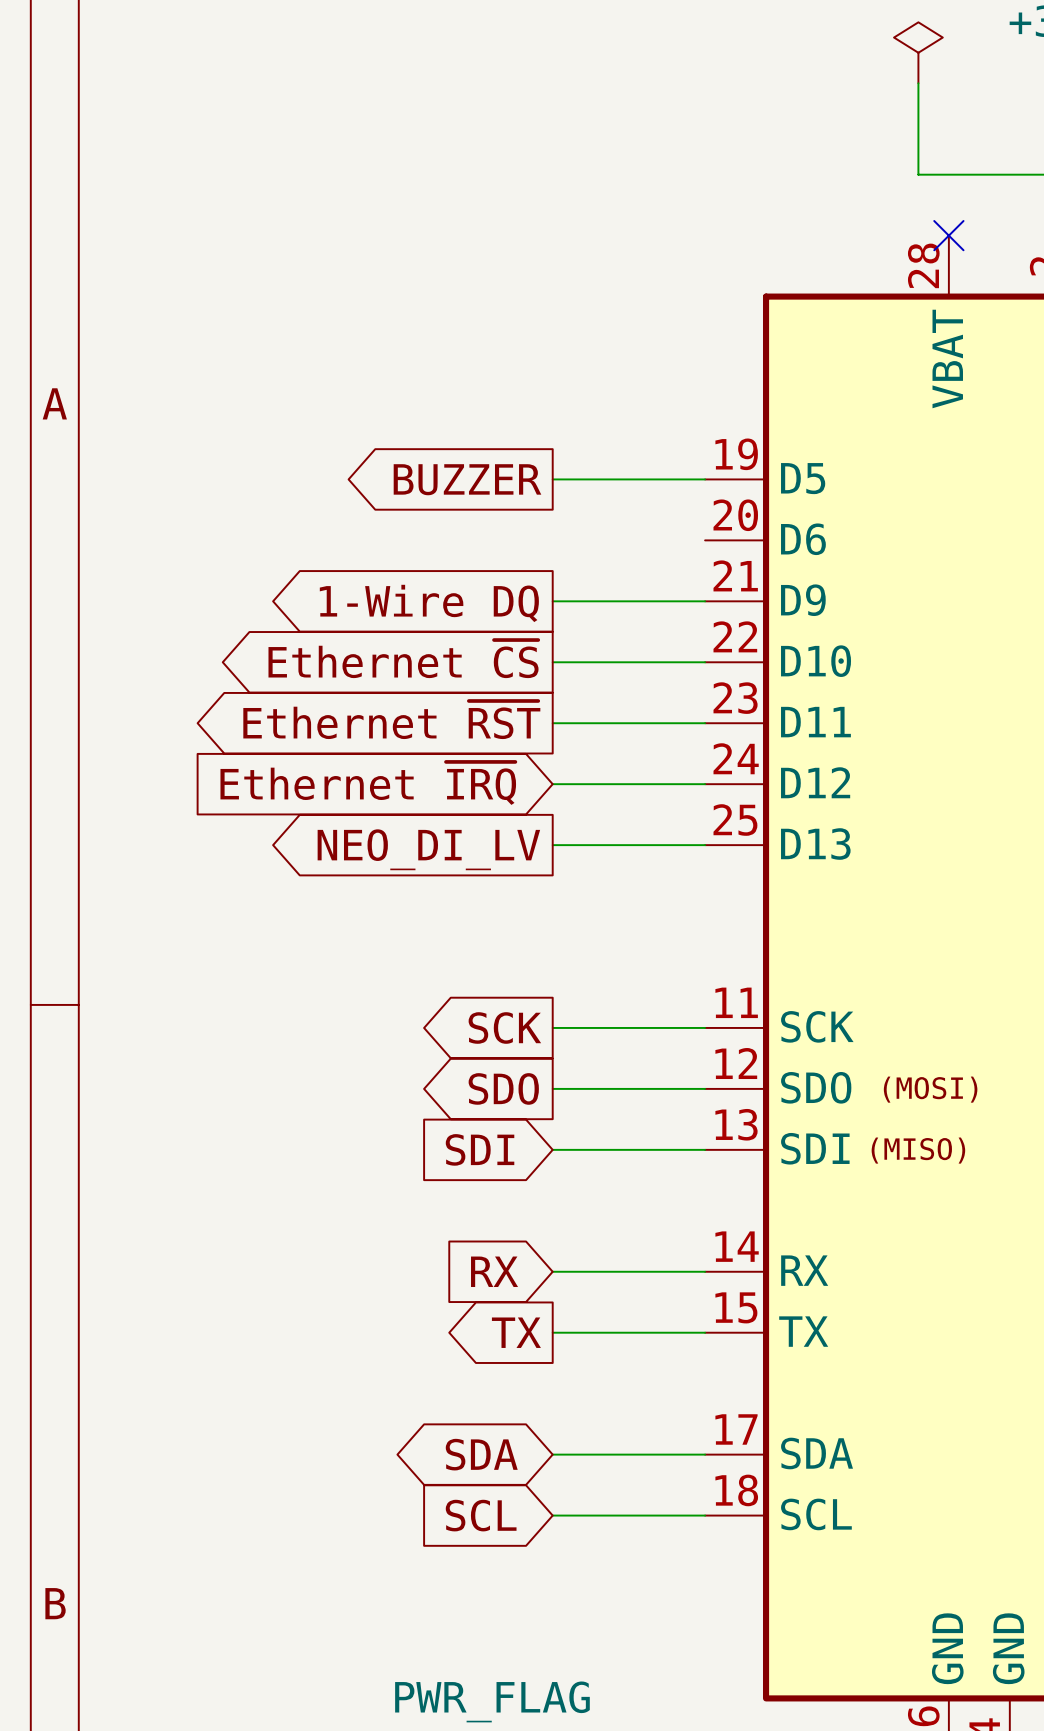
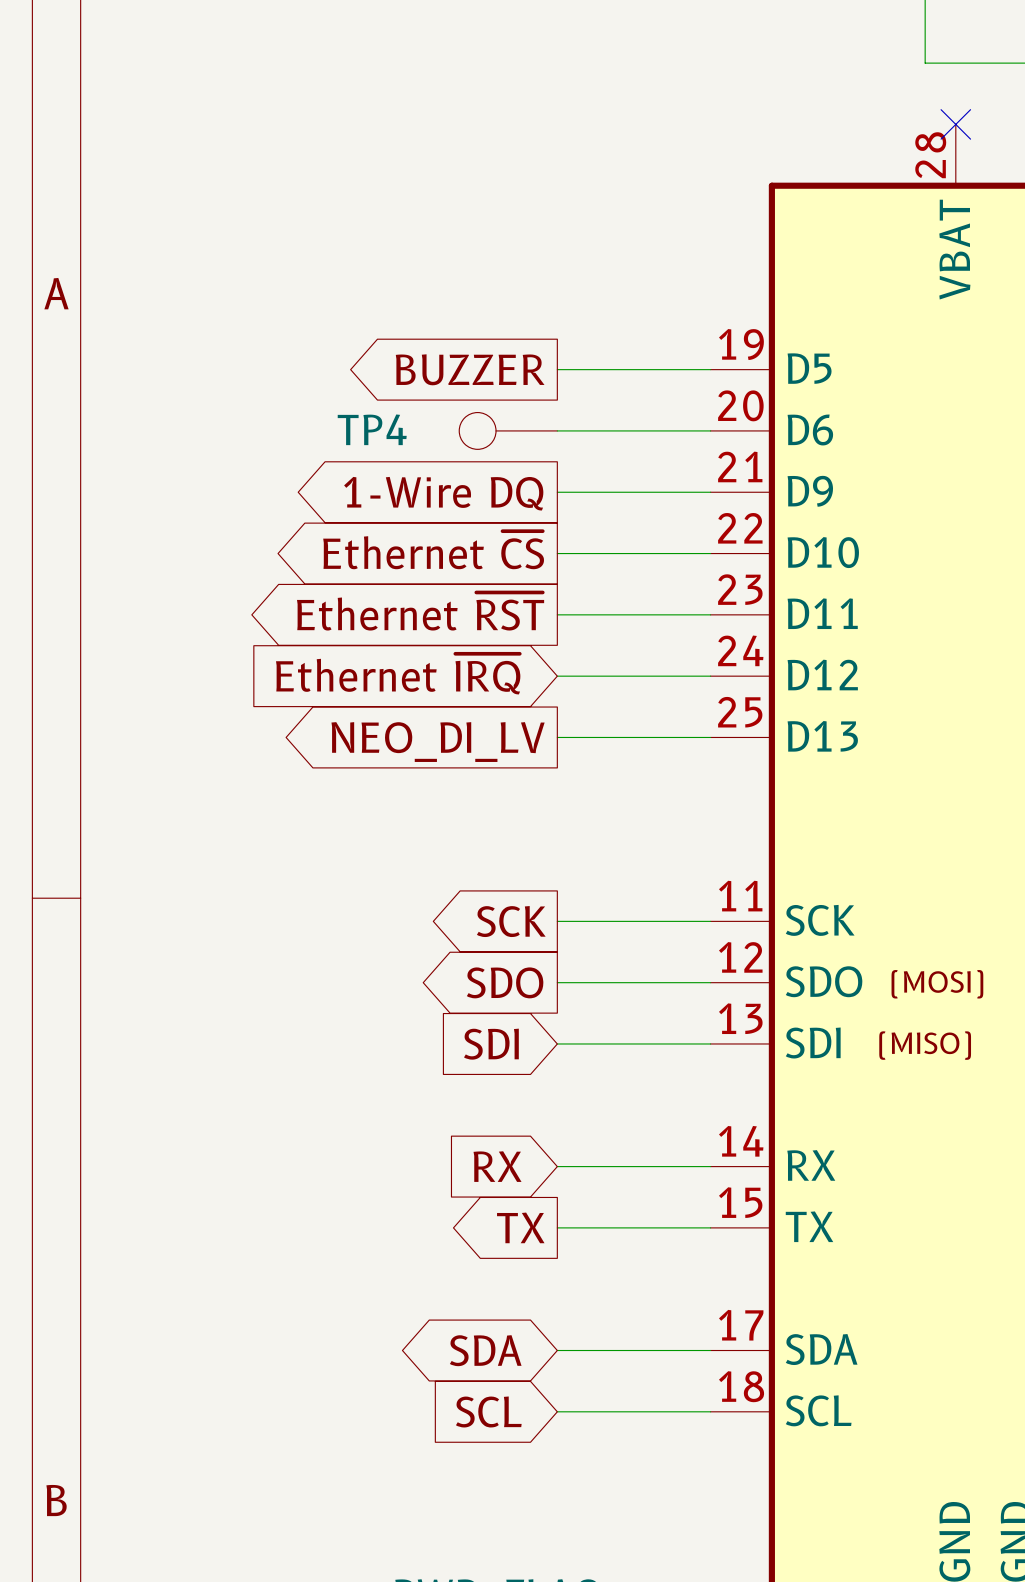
TP4: none -> (508, 430)
wire: none -> (557, 430) (710, 430)

